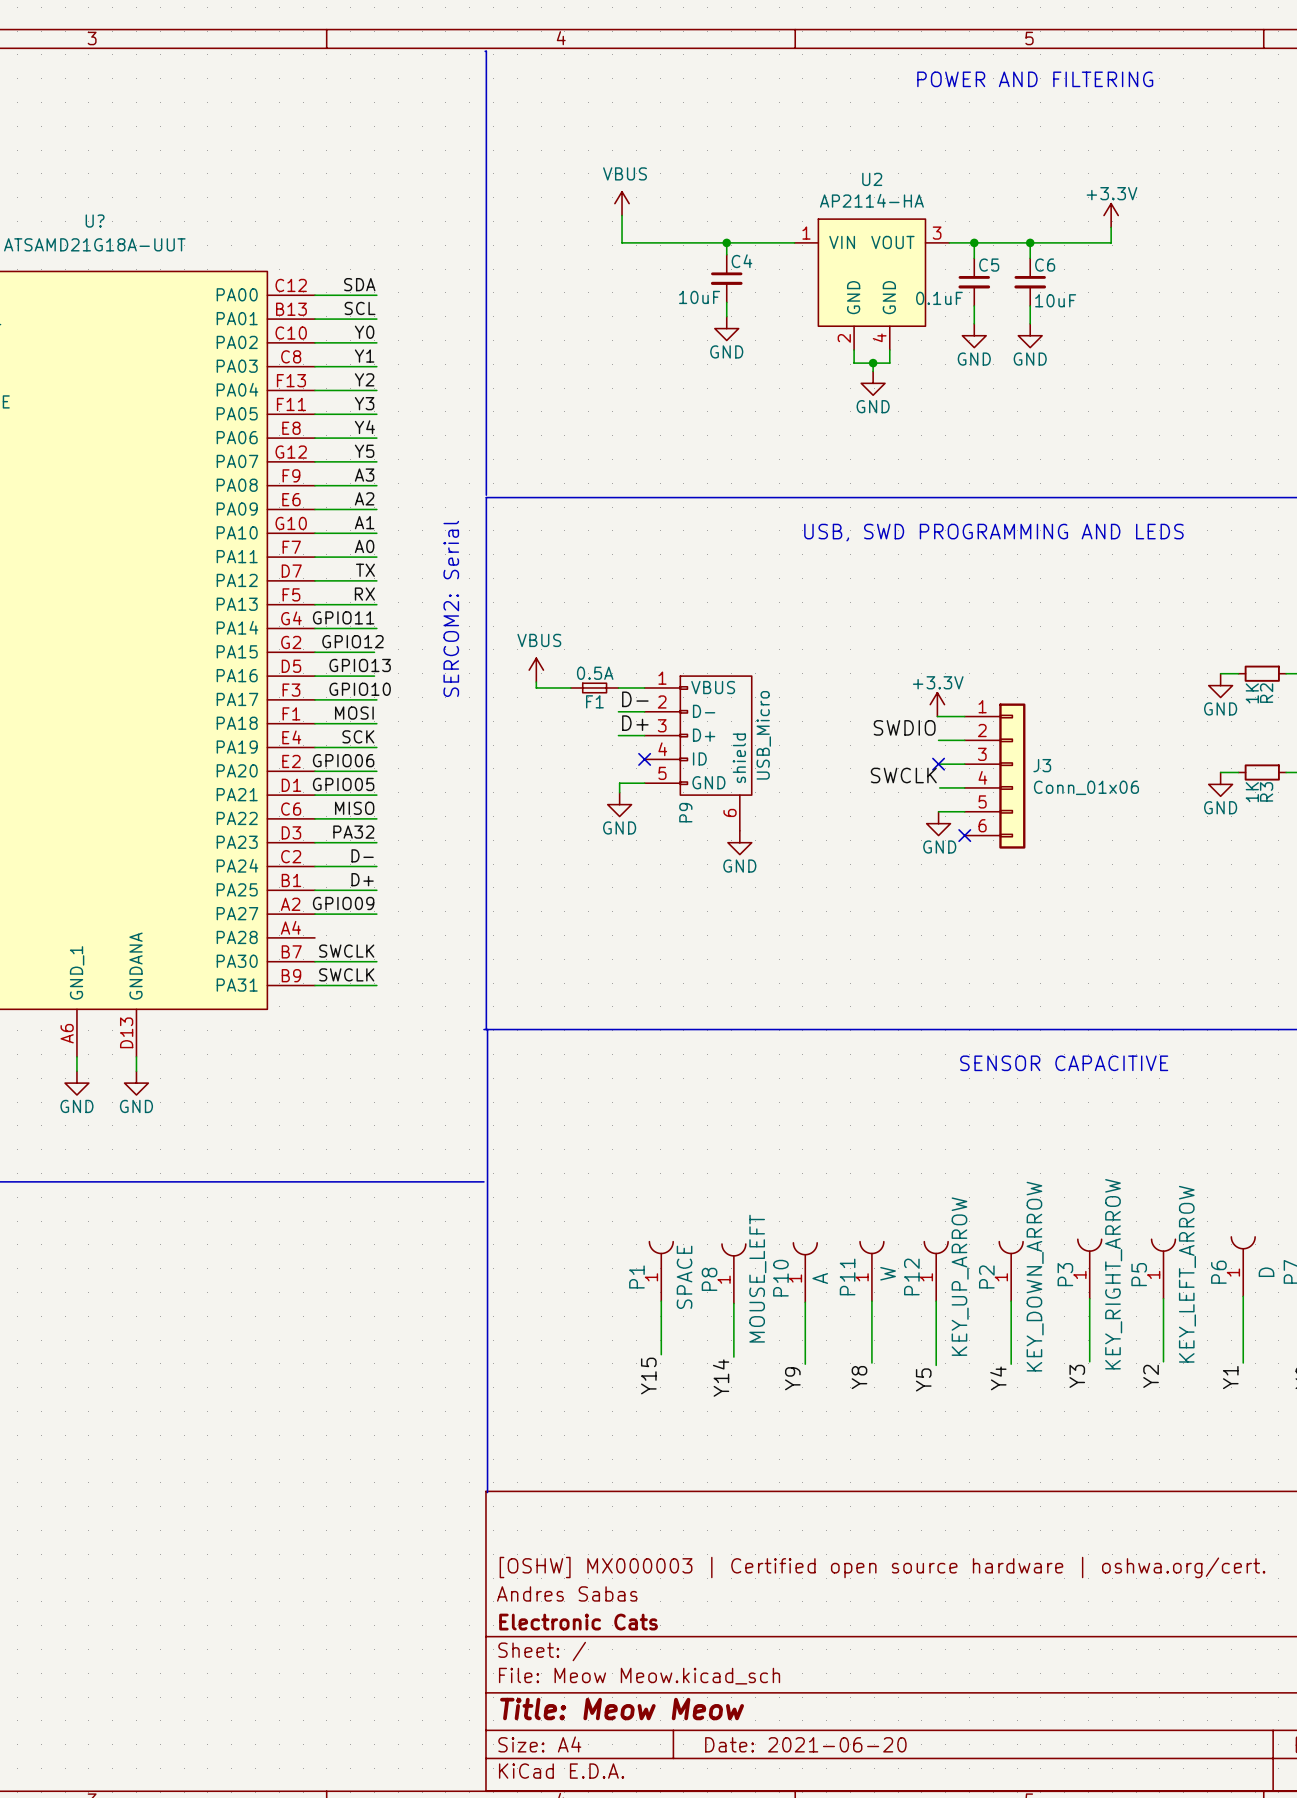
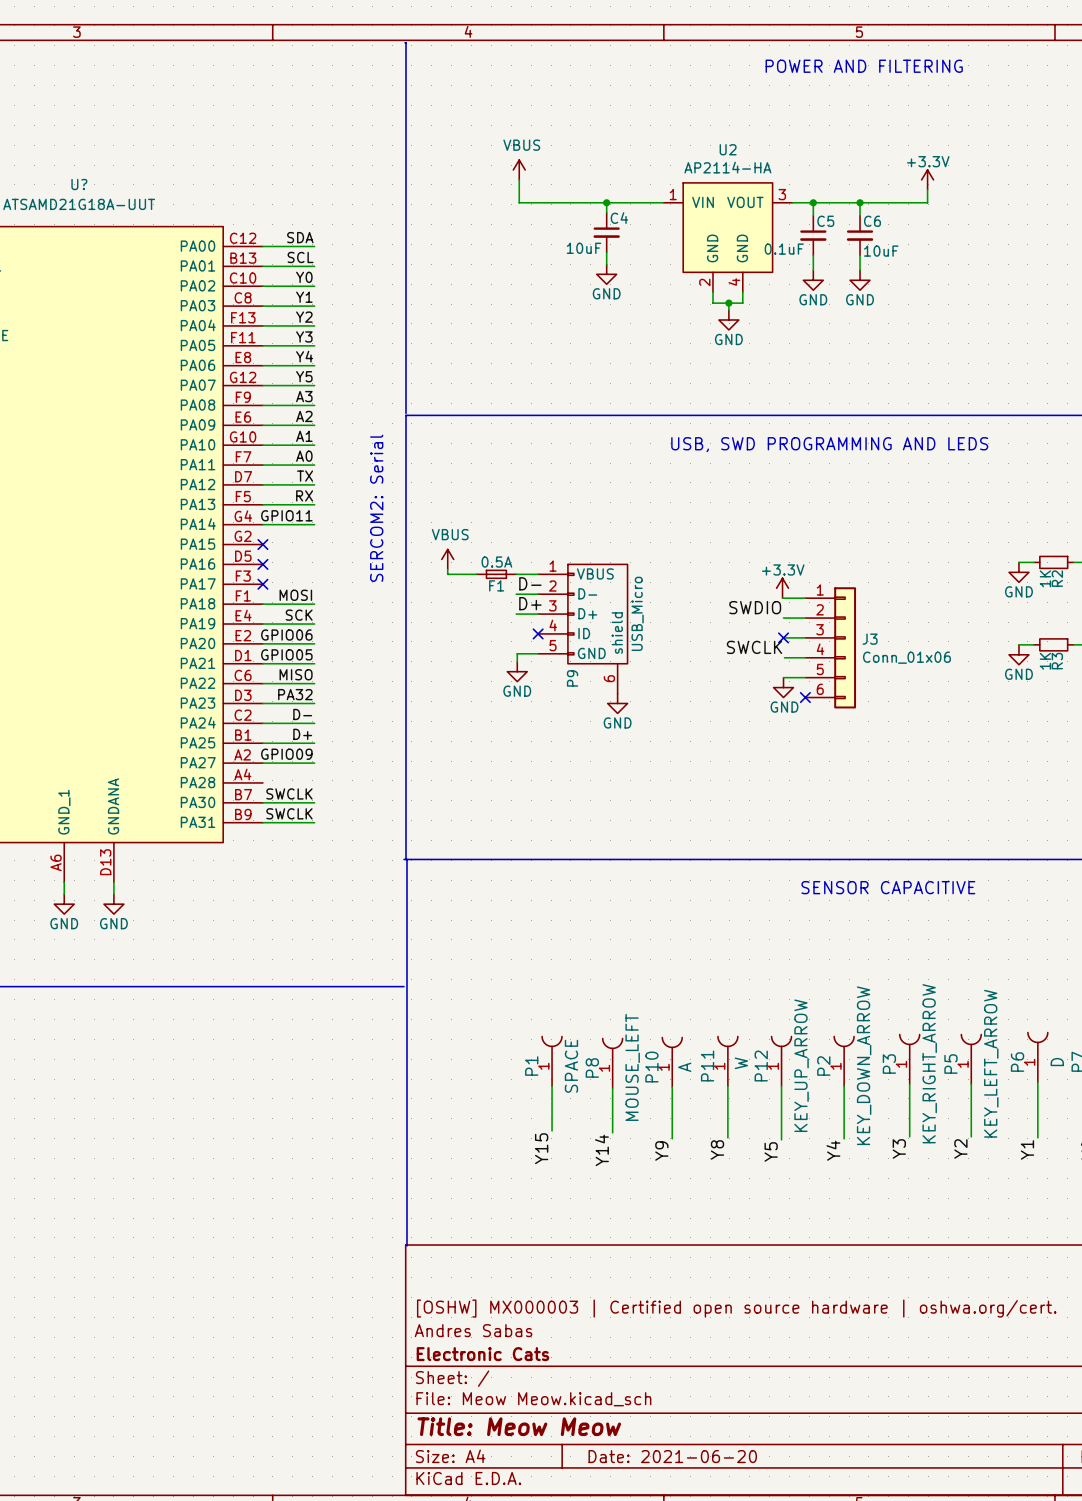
label: GPIO12 (352, 641) -> none
wire: (314, 652) (374, 652) -> none
no-connect mark: none -> (262, 544)
label: GPIO13 (360, 665) -> none
wire: (314, 676) (374, 676) -> none
no-connect mark: none -> (262, 564)
label: GPIO10 (360, 689) -> none
wire: (314, 699) (376, 699) -> none
no-connect mark: none -> (262, 584)

